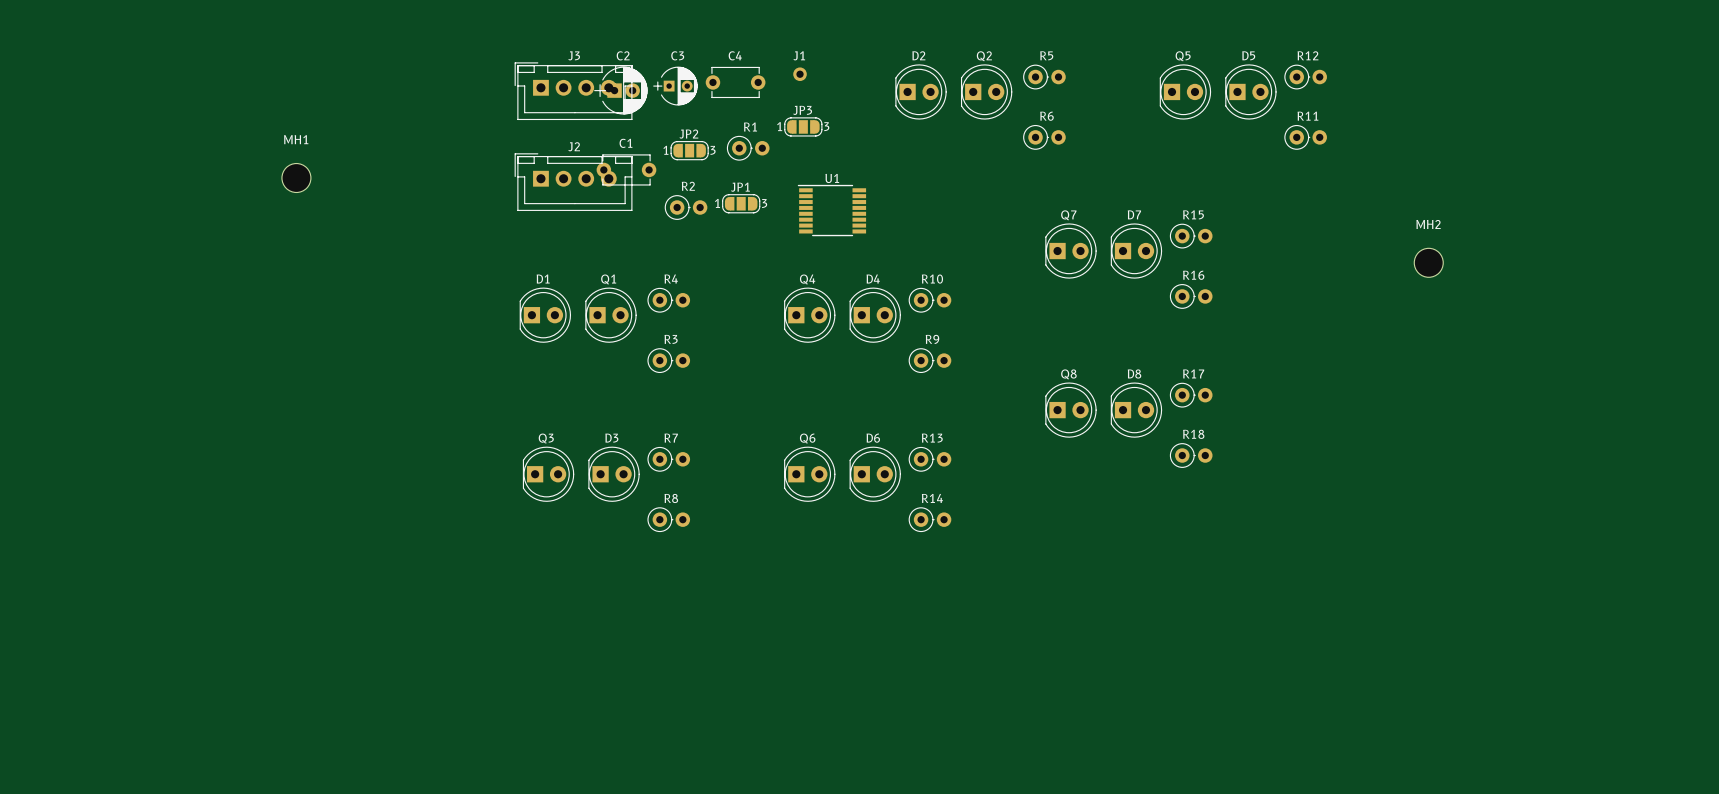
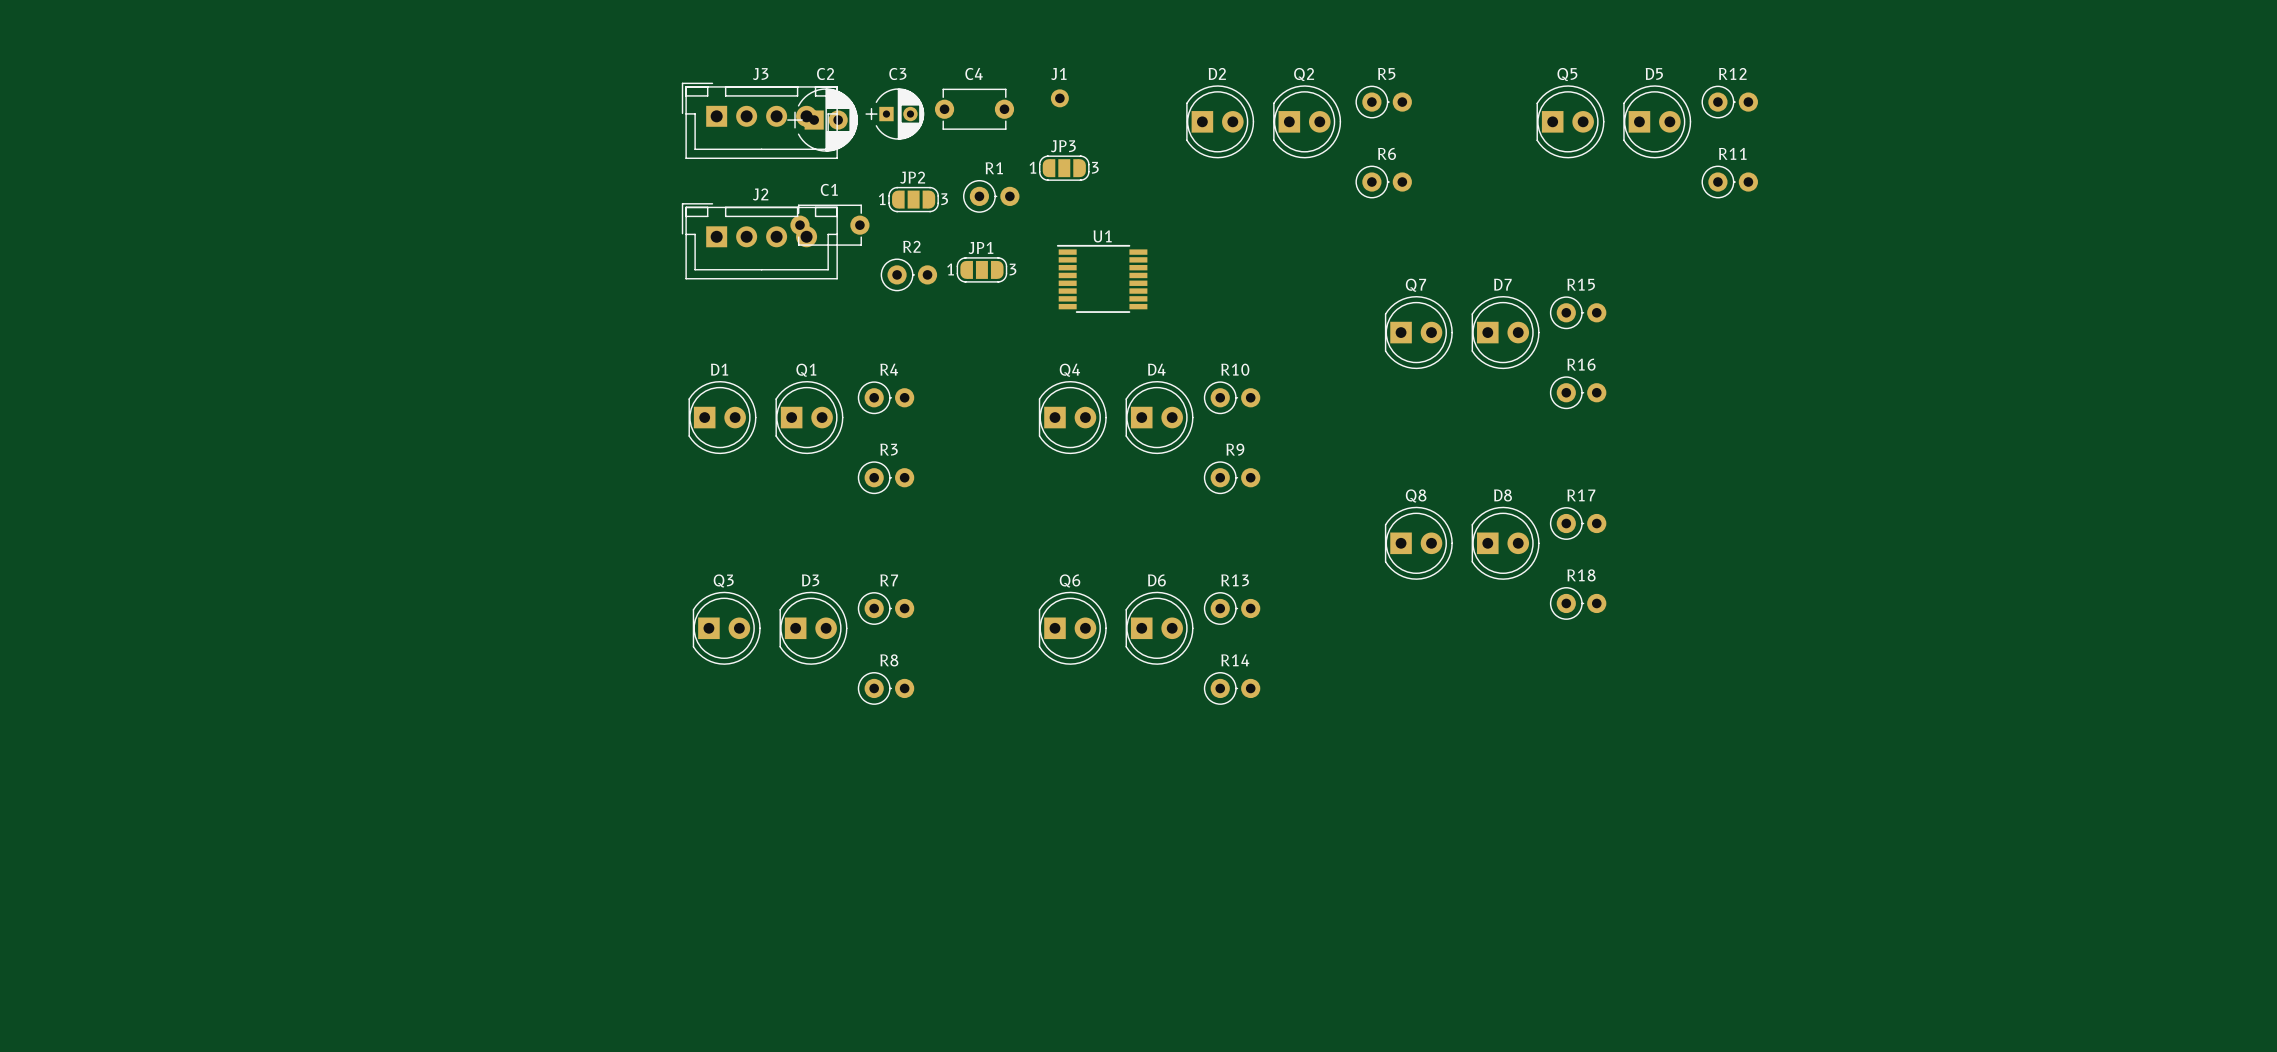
MH1: (296, 178) -> none
MH2: (1428, 262) -> none

